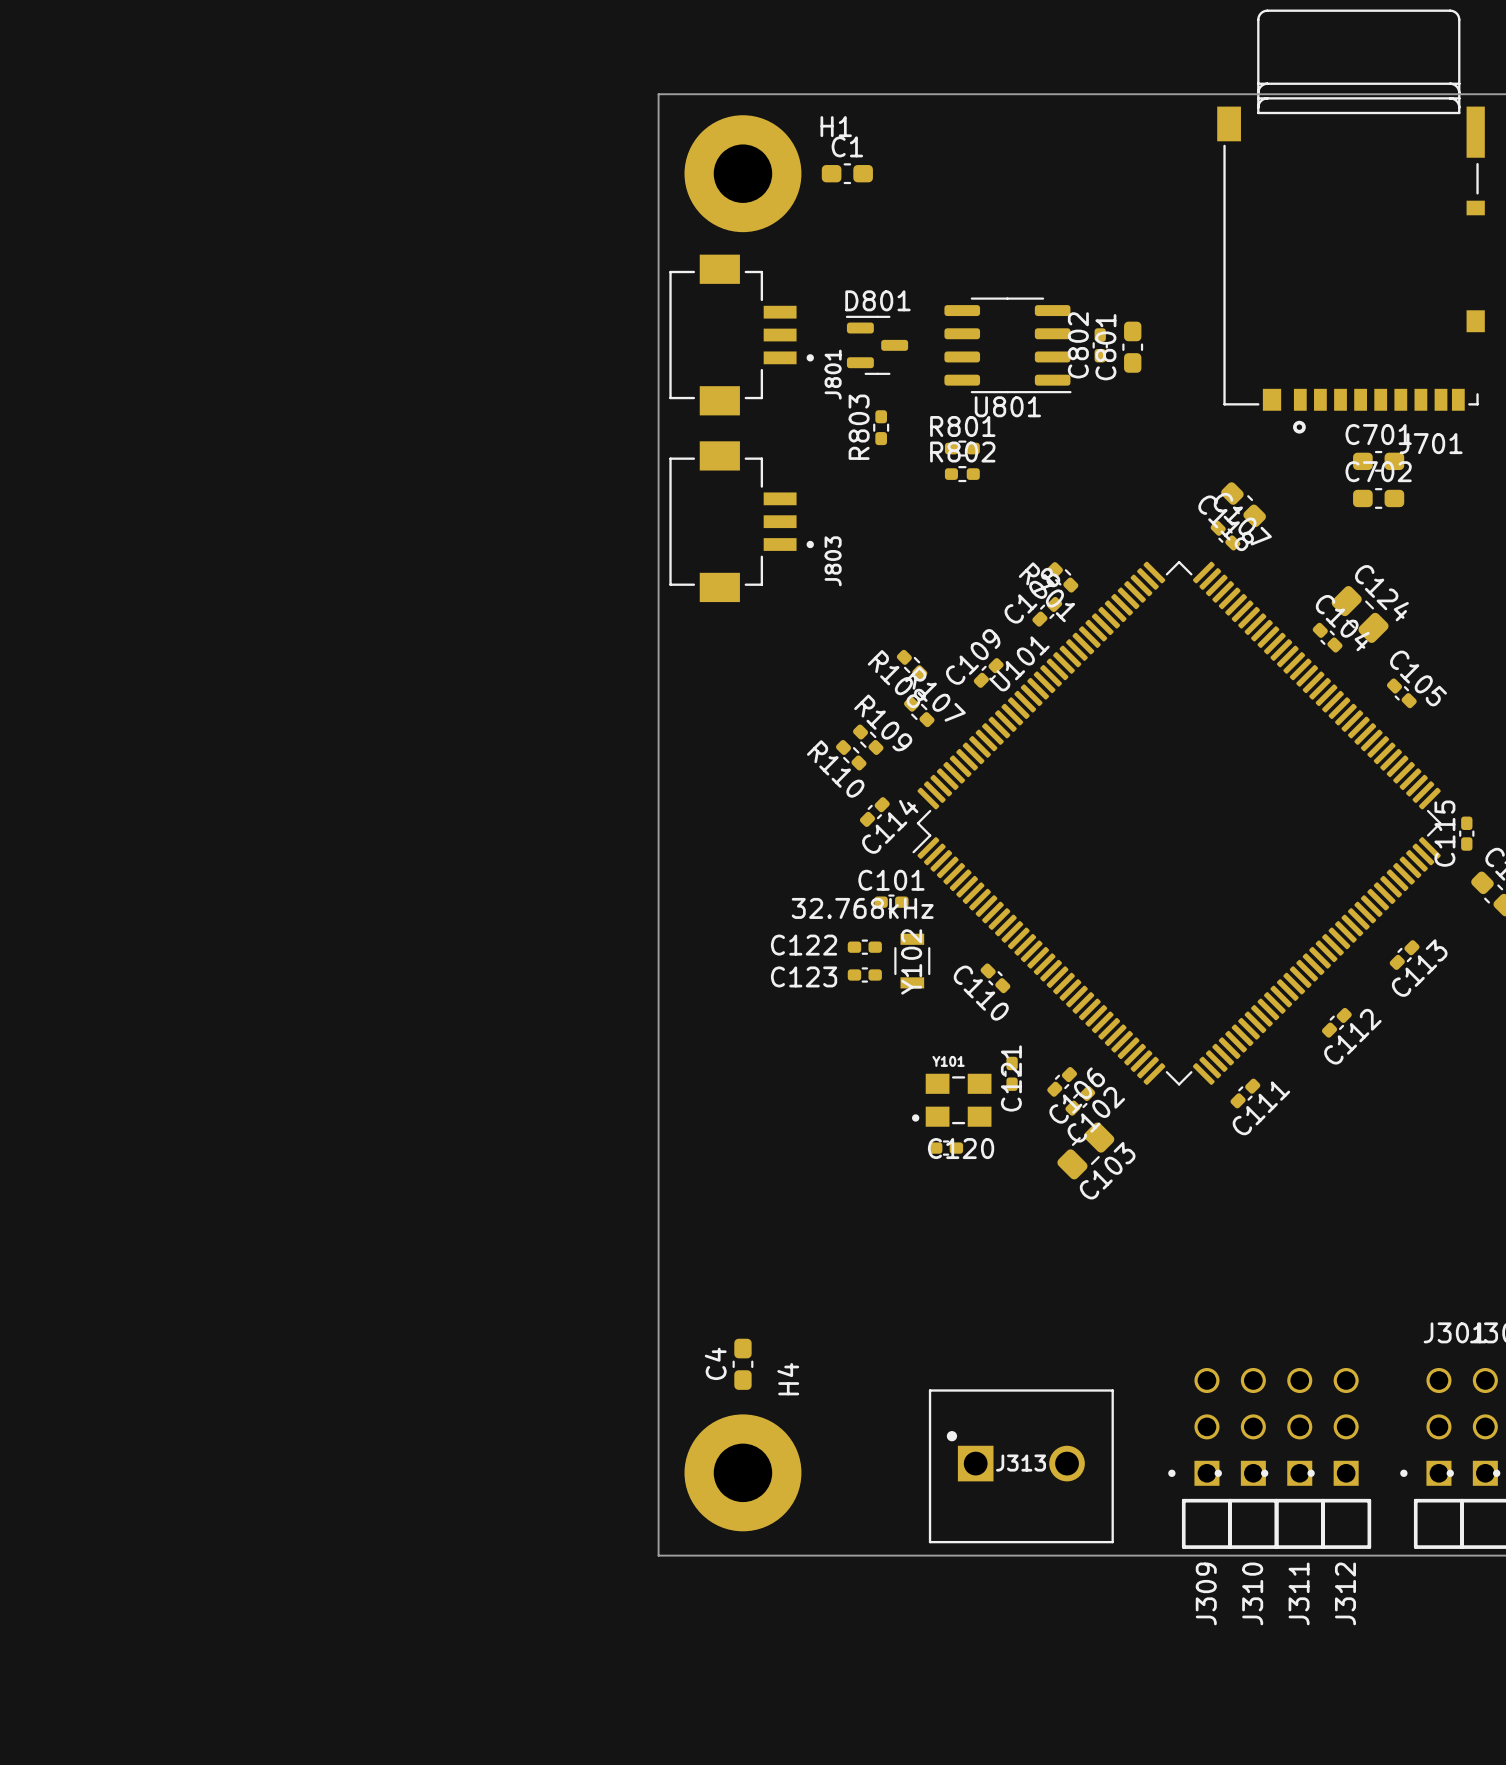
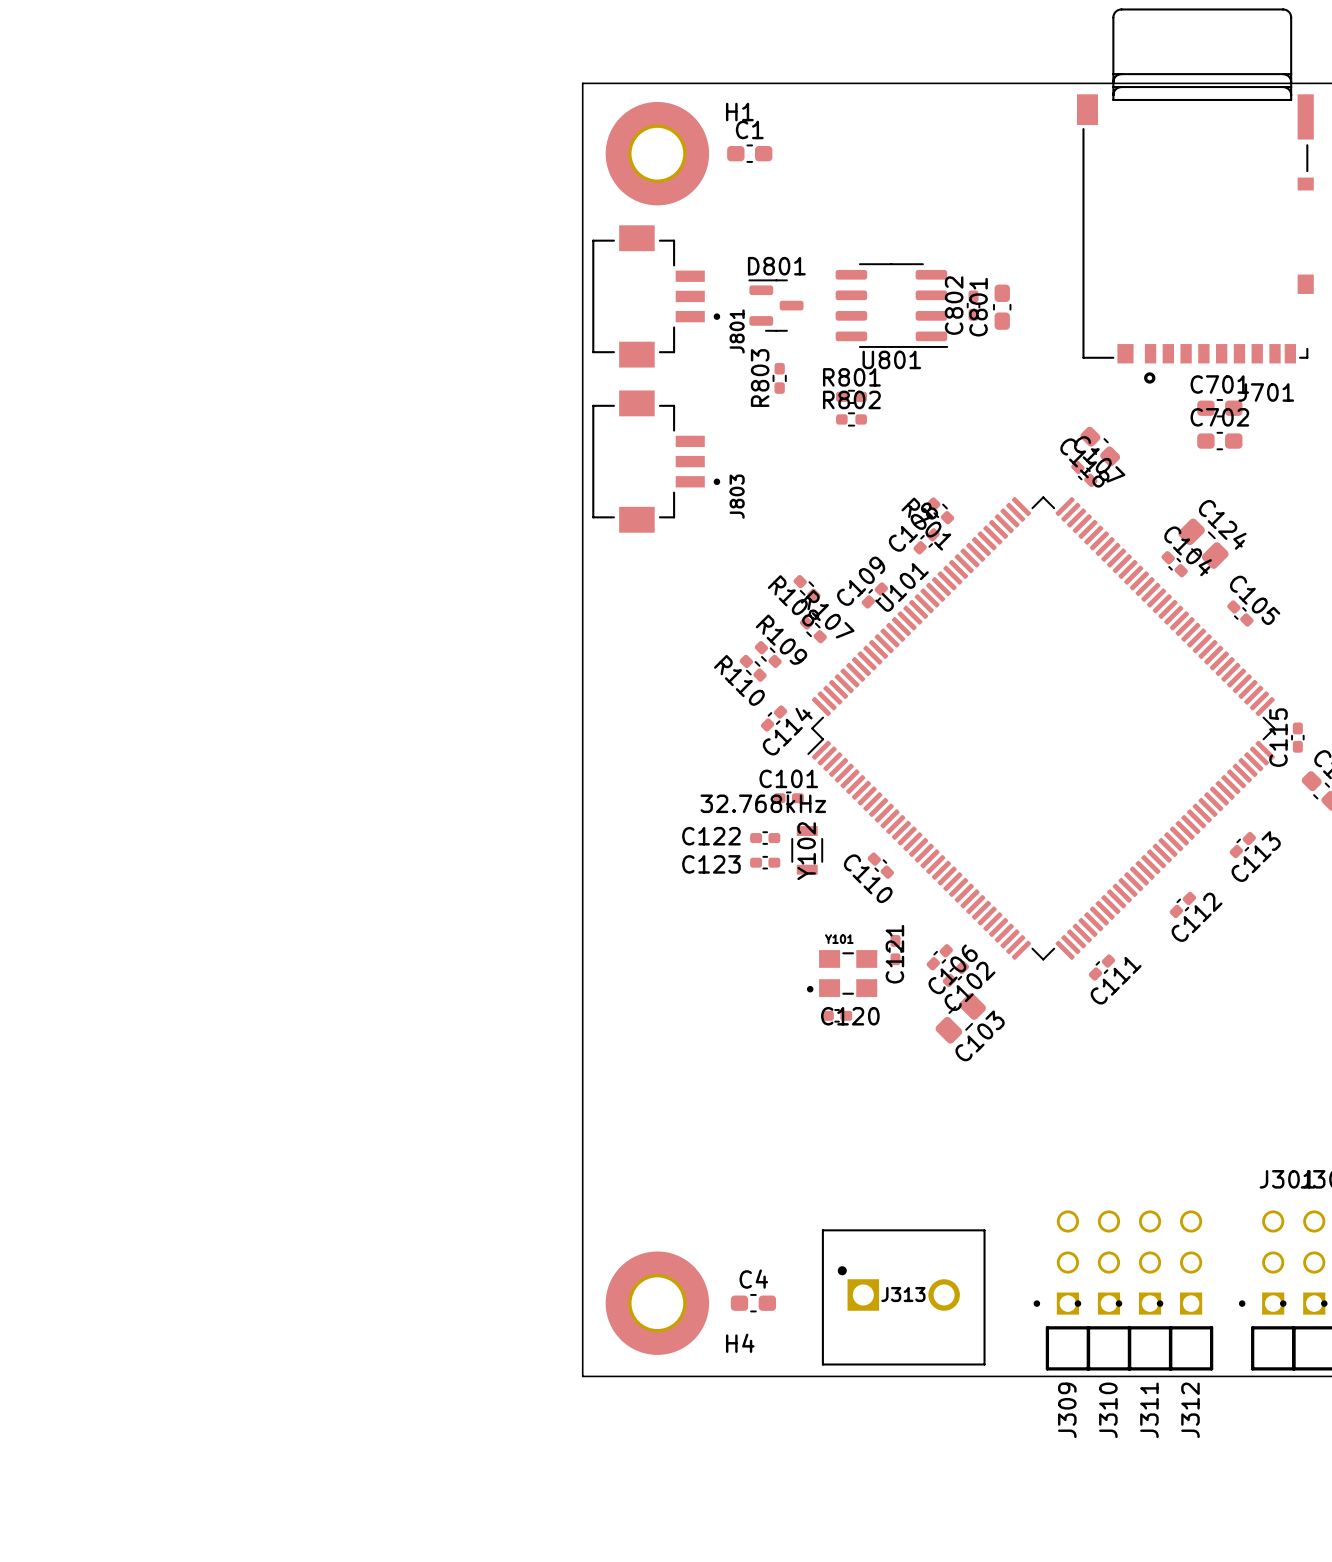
C4 rotation: 0° (742, 1364) -> 90° clockwise (753, 1303)
C4 position: (742, 1364) -> (753, 1303)
H4 name rotation: 0° (788, 1379) -> 90° clockwise (740, 1343)
H4 name position: H4 (788, 1379) -> H4 (740, 1343)

